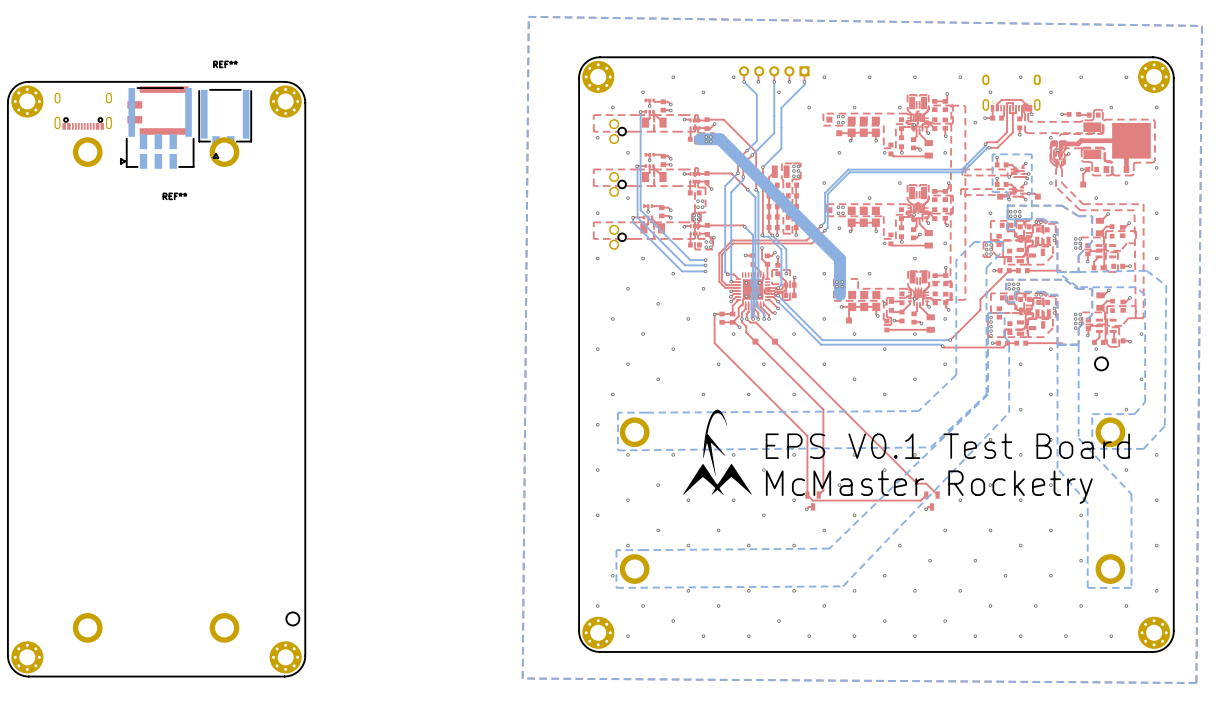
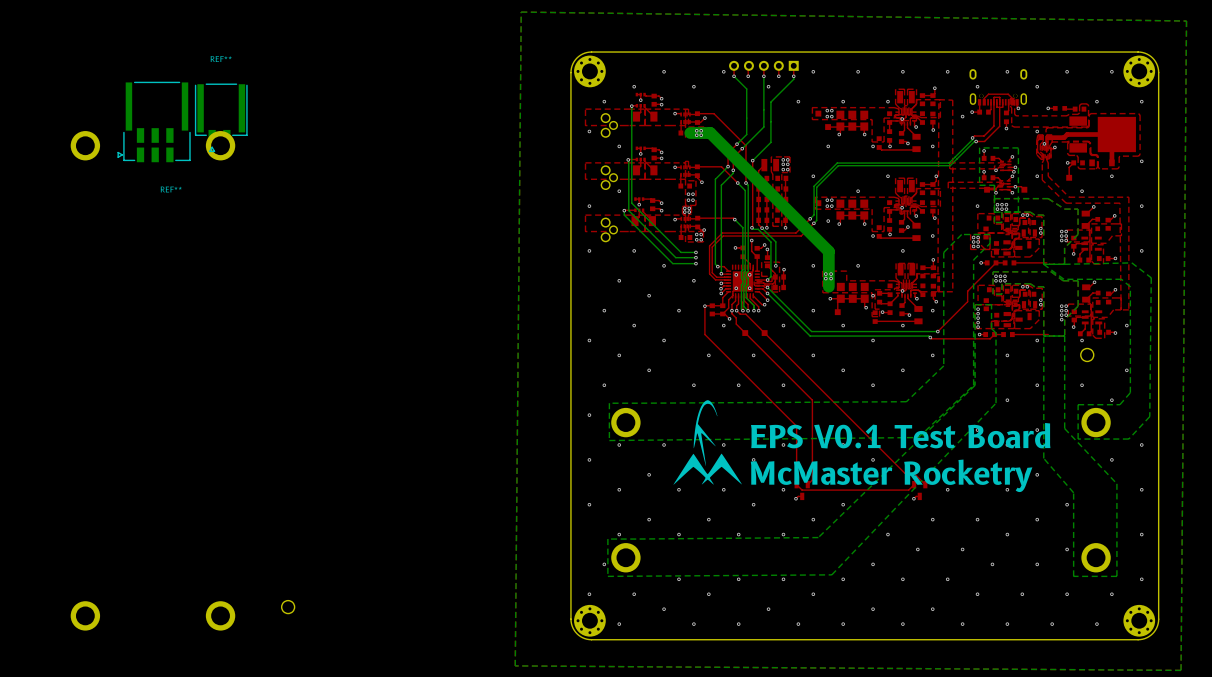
board edge: (284, 81) (28, 81) (17, 85) (9, 93) (7, 102) (7, 655) (11, 666) (19, 674) (28, 676) (284, 676) (295, 673) (303, 664) (305, 655) (305, 102) (304, 95) (299, 87) (293, 83) (284, 81) -> none
part: (27, 101) -> none
part: (285, 101) -> none
part: (157, 110) -> none
part: (83, 111) -> none
part: (27, 657) -> none
part: (285, 657) -> none

